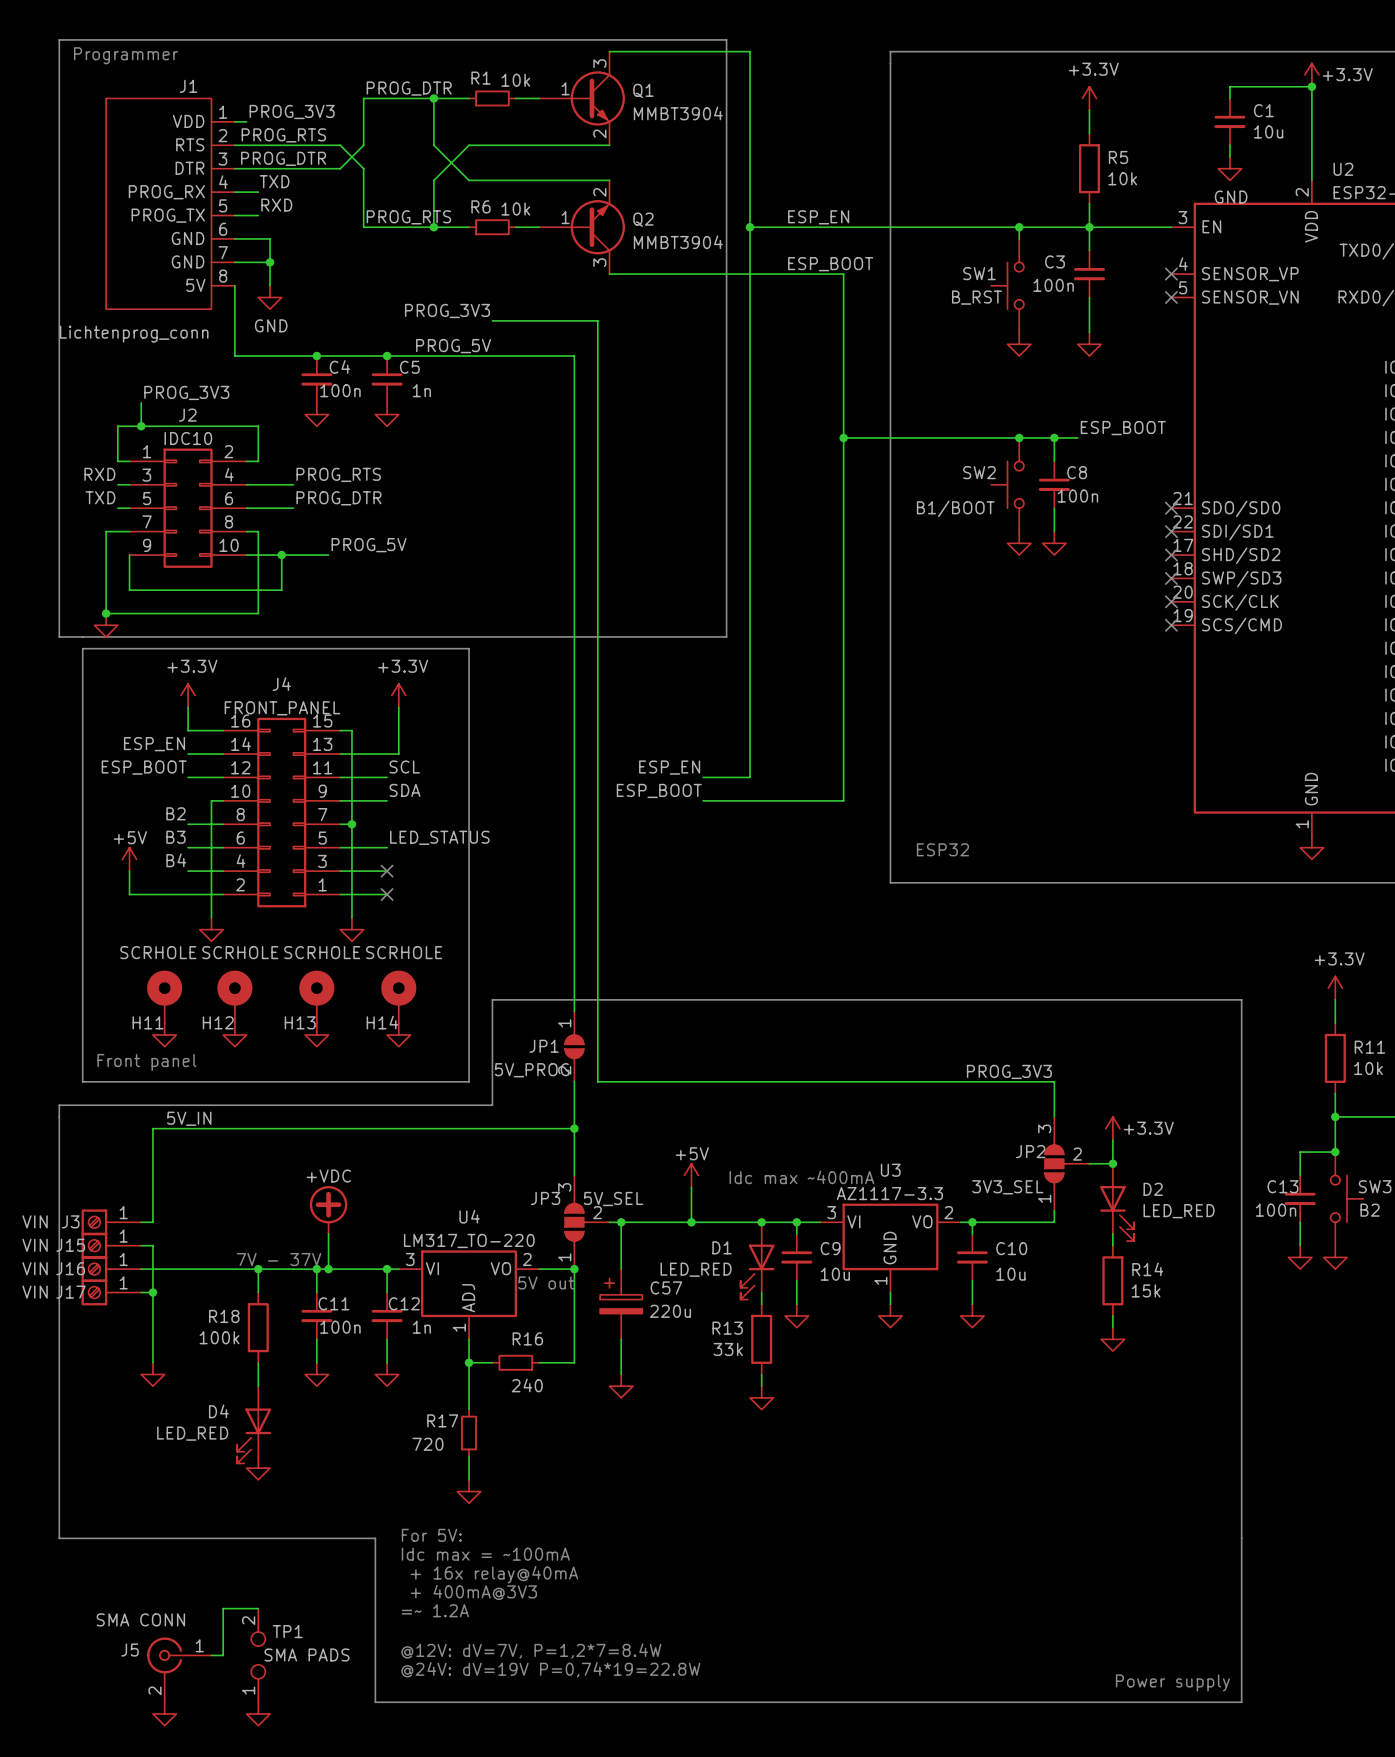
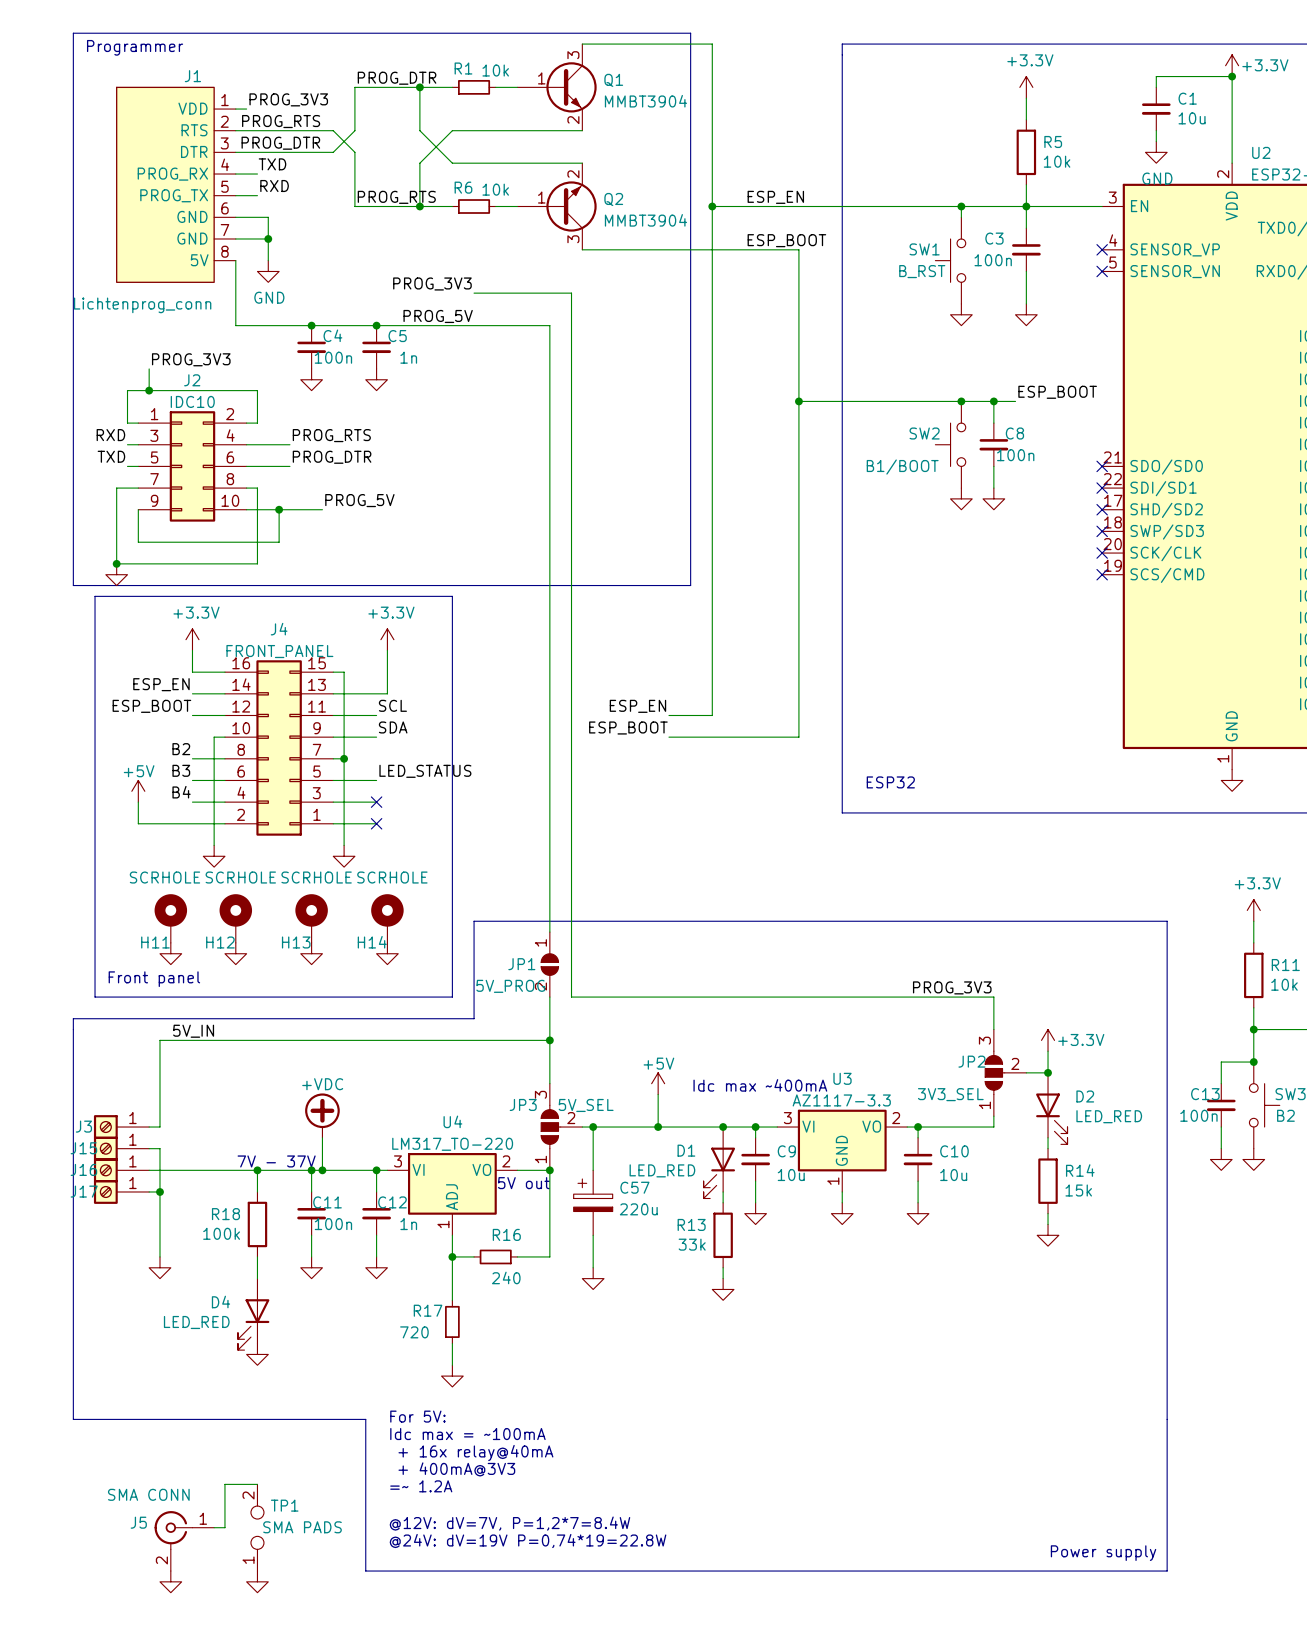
J3 value: VIN (35, 1221) -> none
J15 value: VIN (35, 1245) -> none
J16 value: VIN (35, 1268) -> none
J17 value: VIN (35, 1292) -> none

